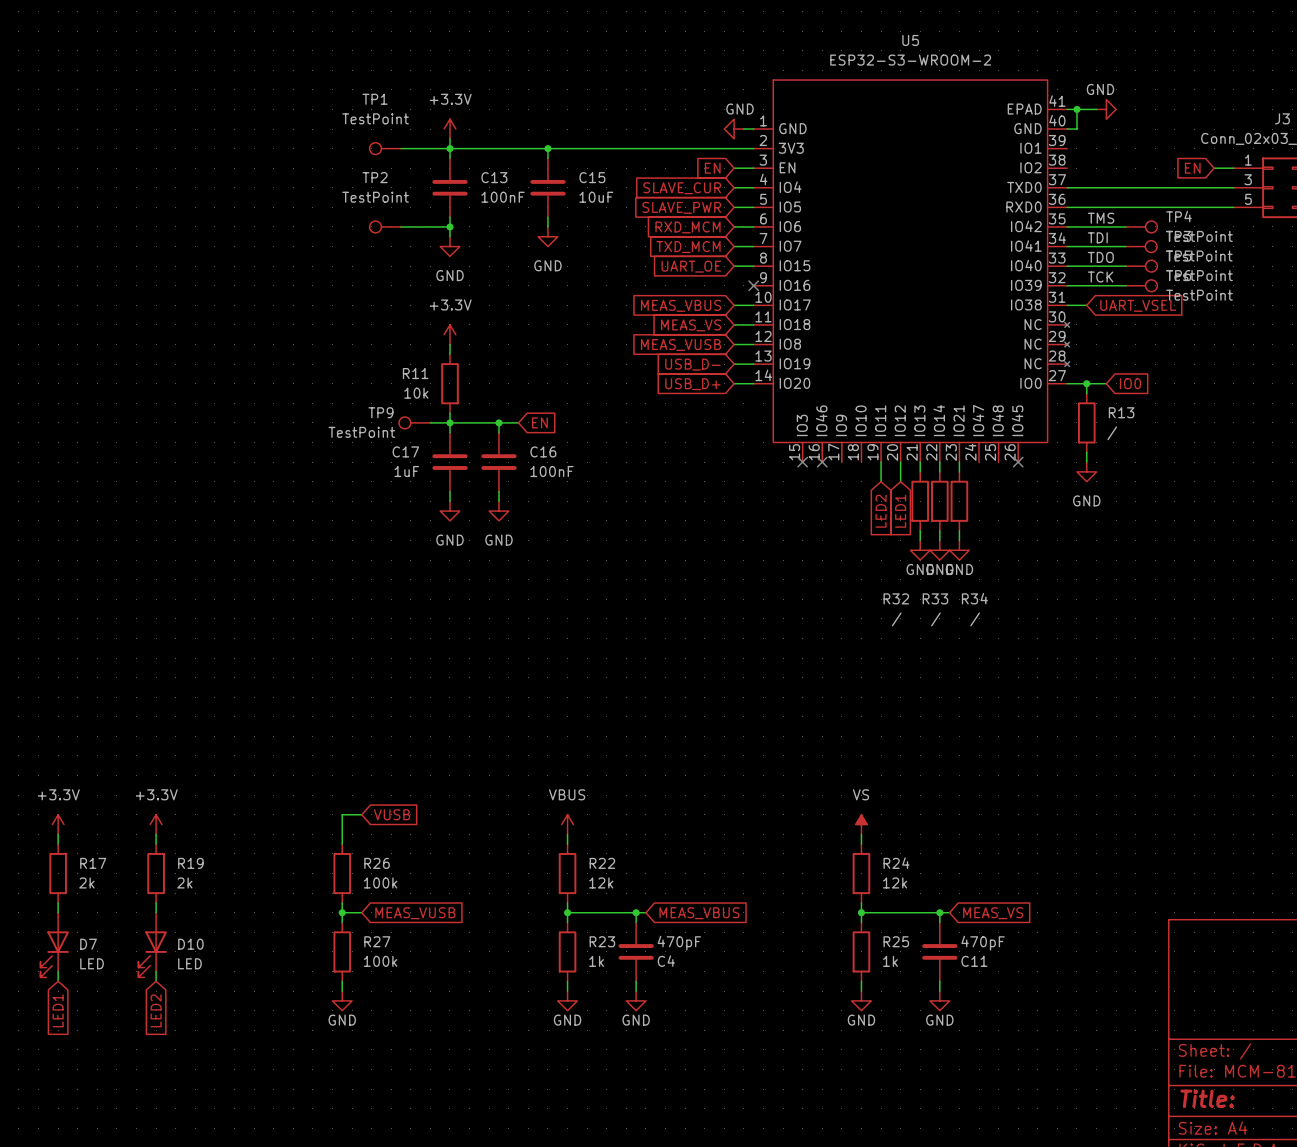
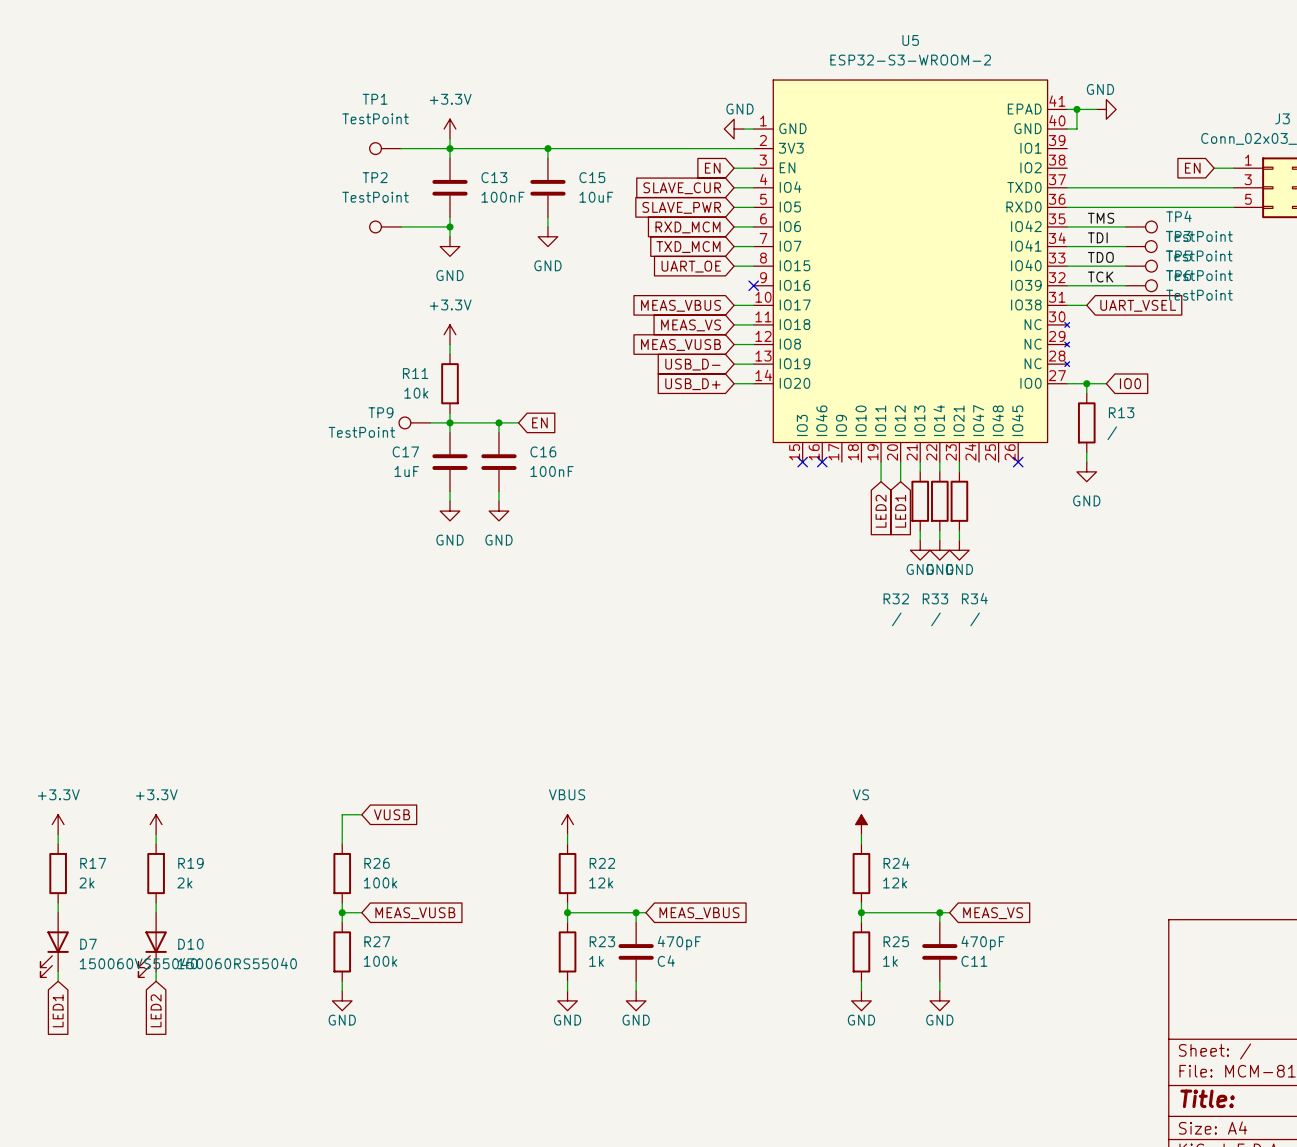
D7 value: LED (92, 963) -> 150060VS55040 (138, 963)
D10 value: LED (189, 963) -> 150060RS55040 (237, 963)

